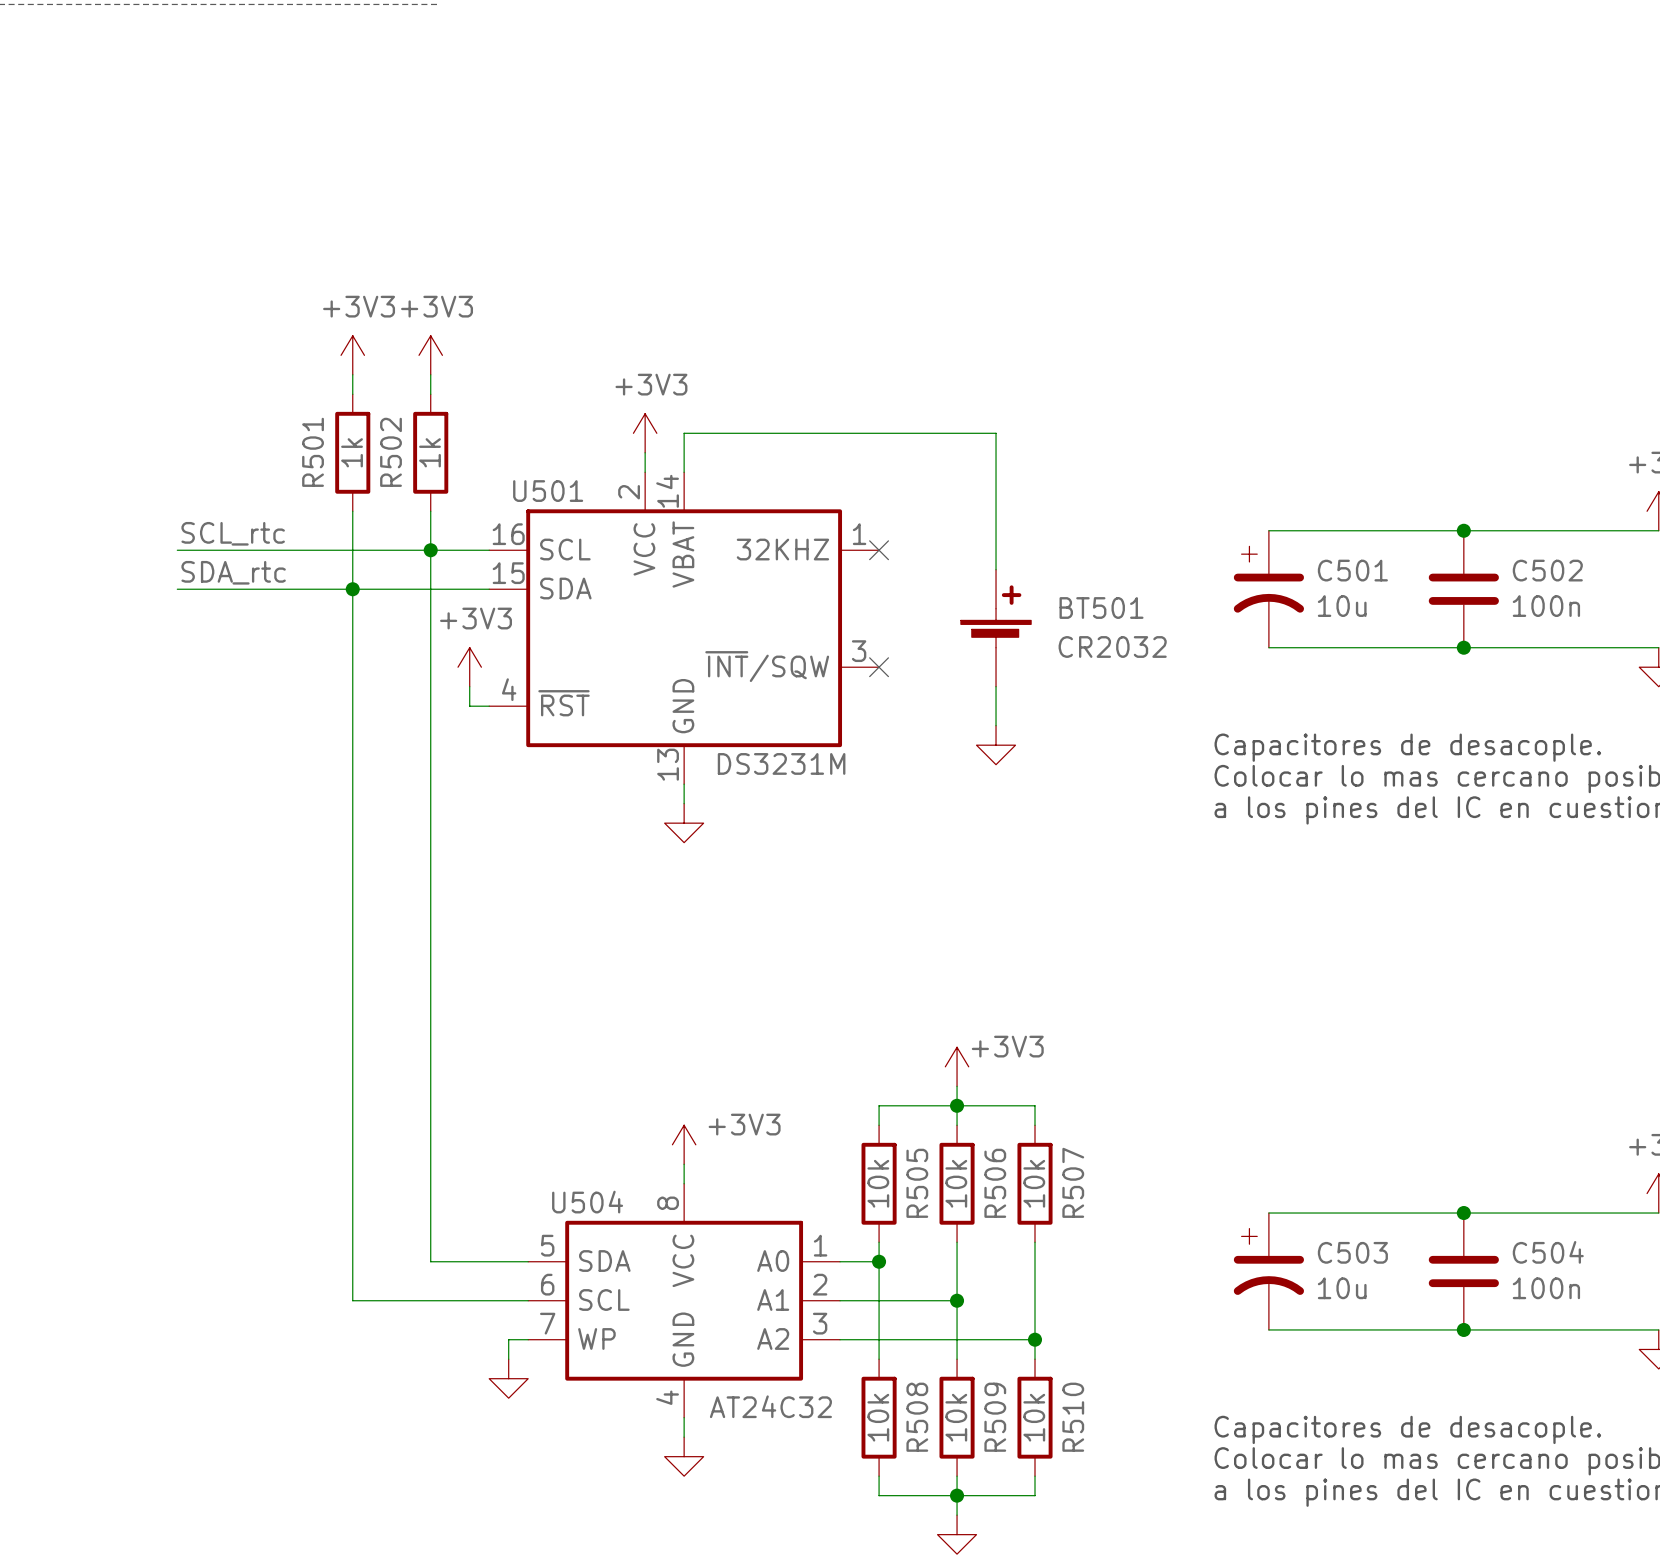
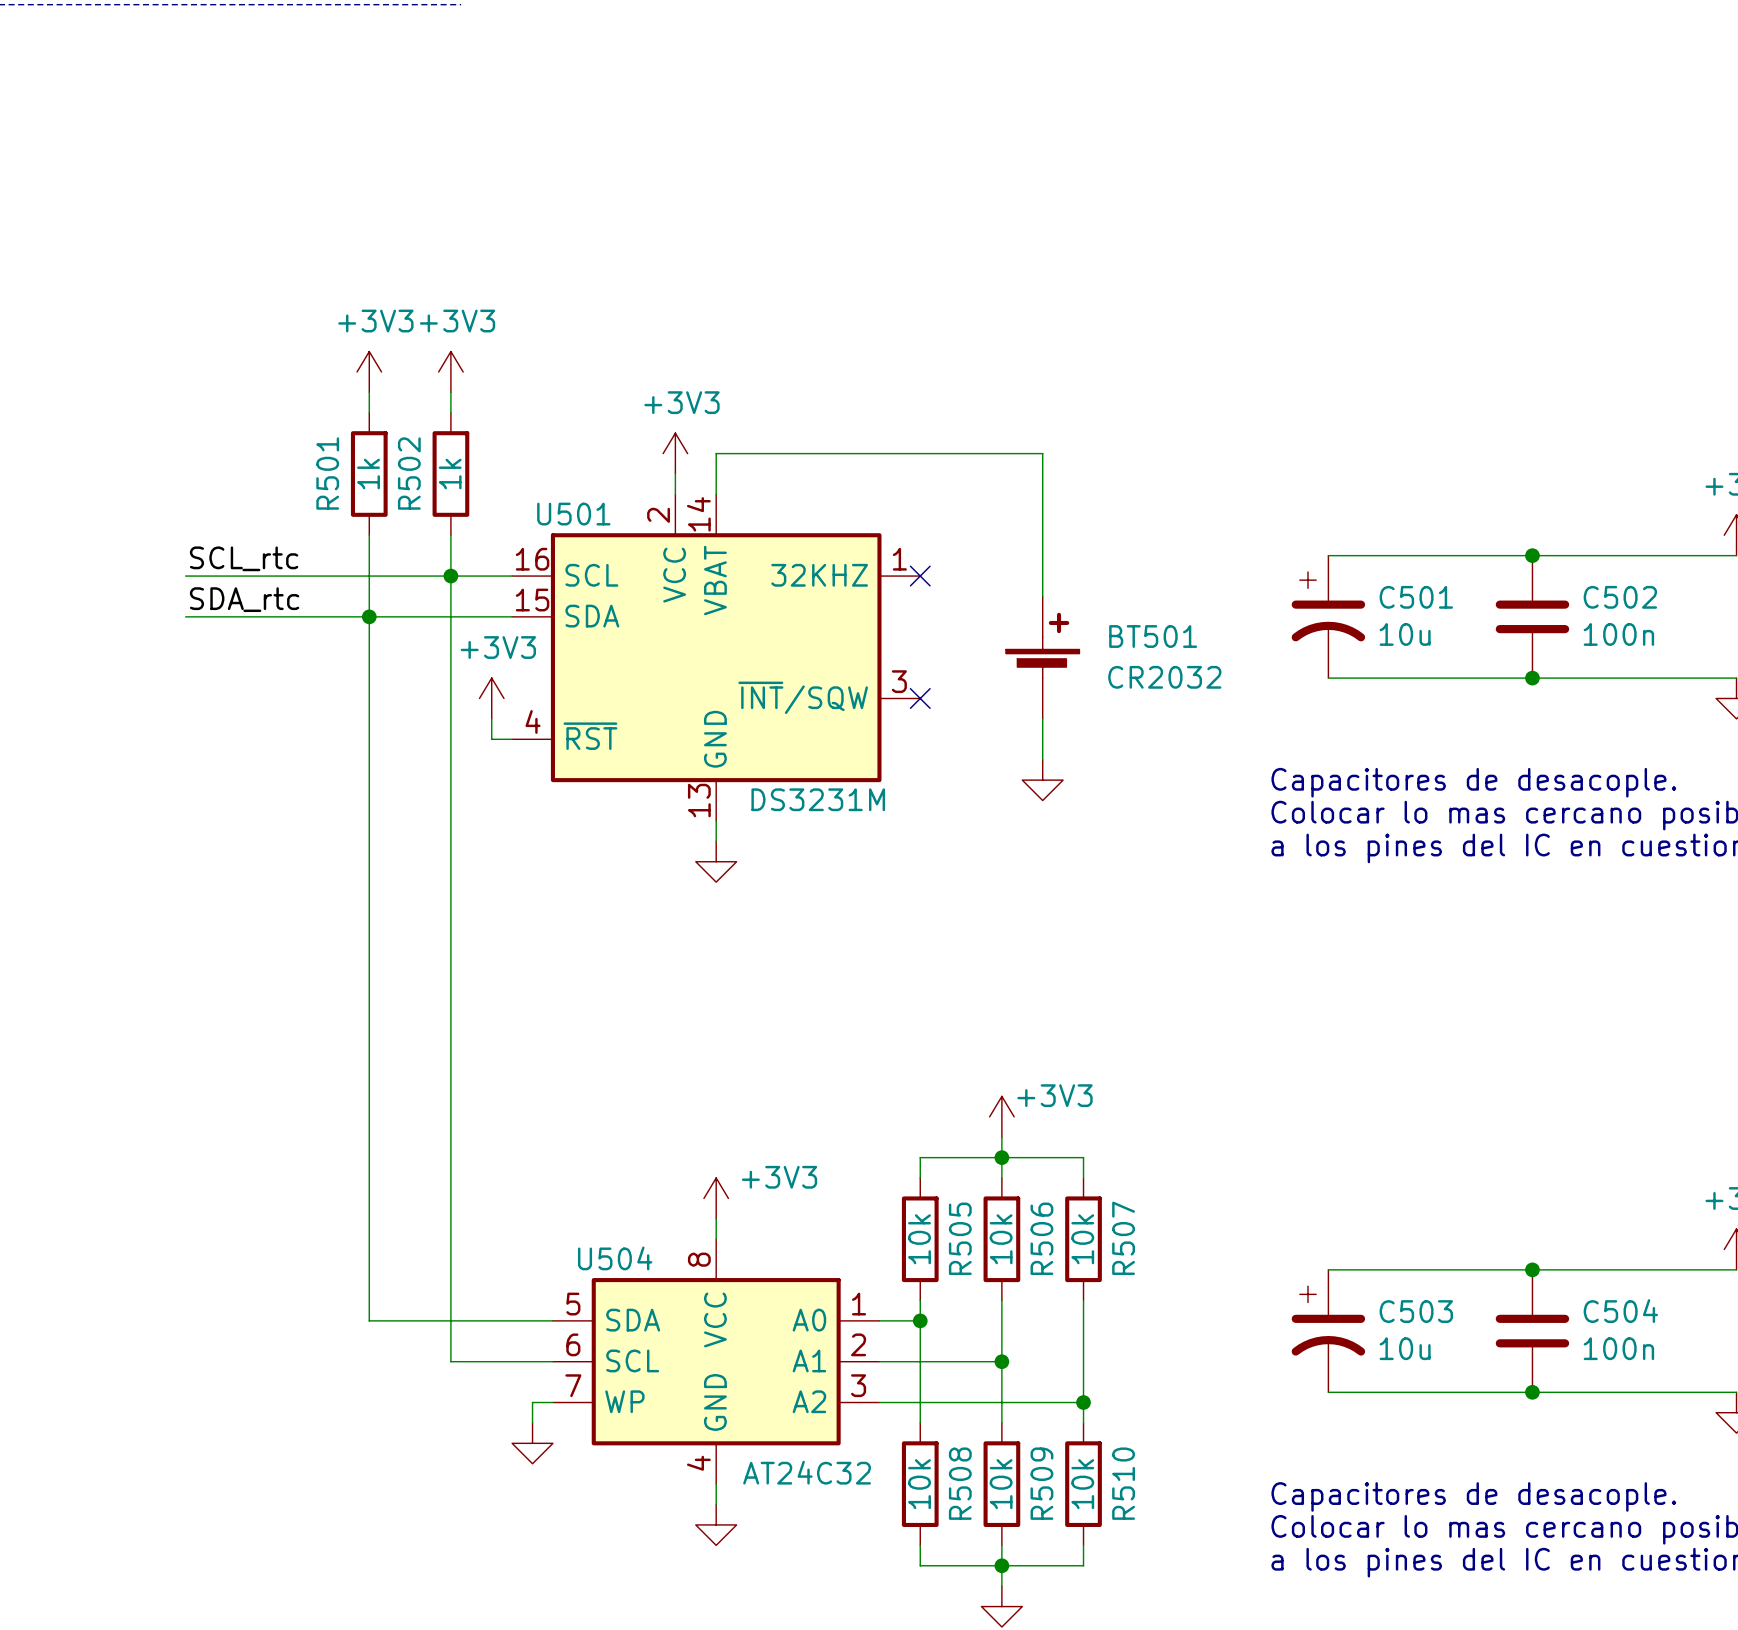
wire: (352, 1261) (352, 1300) (430, 1300) -> (369, 1320) (450, 1320) (450, 1361)

